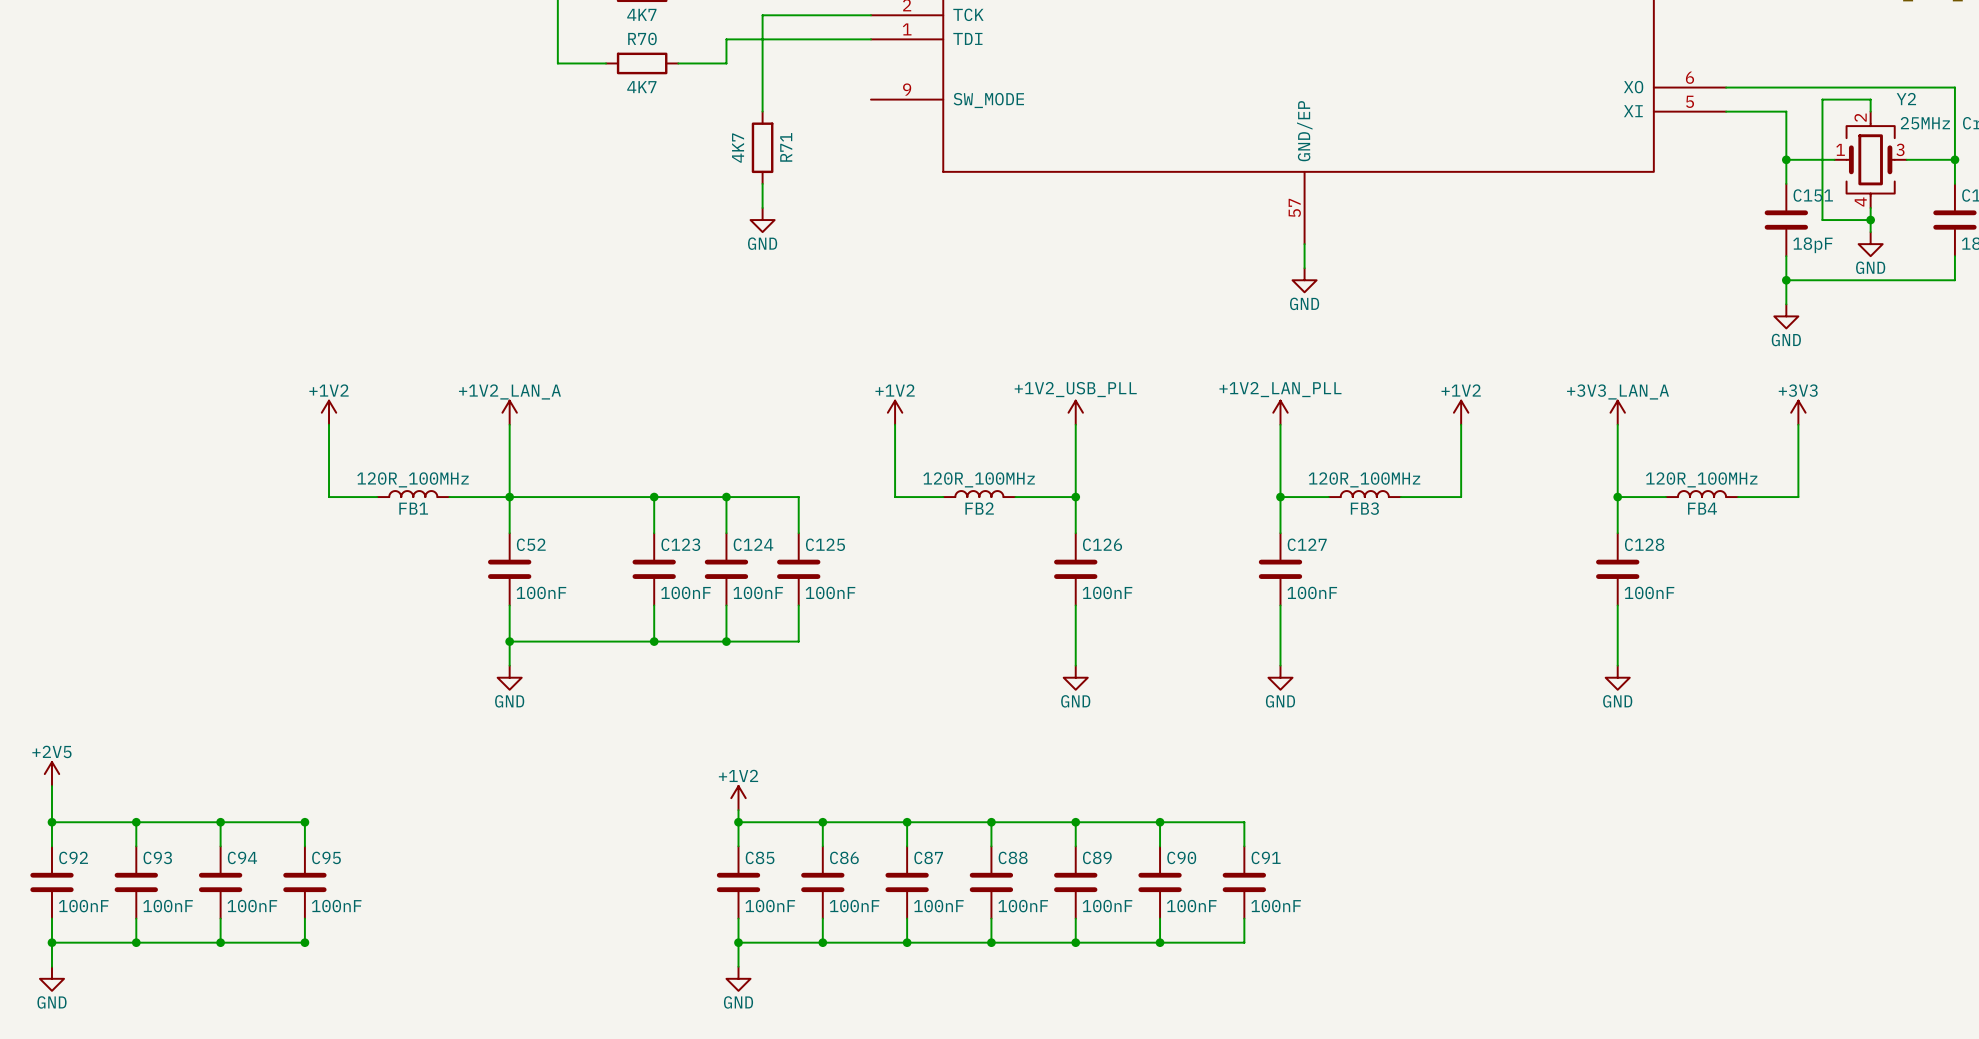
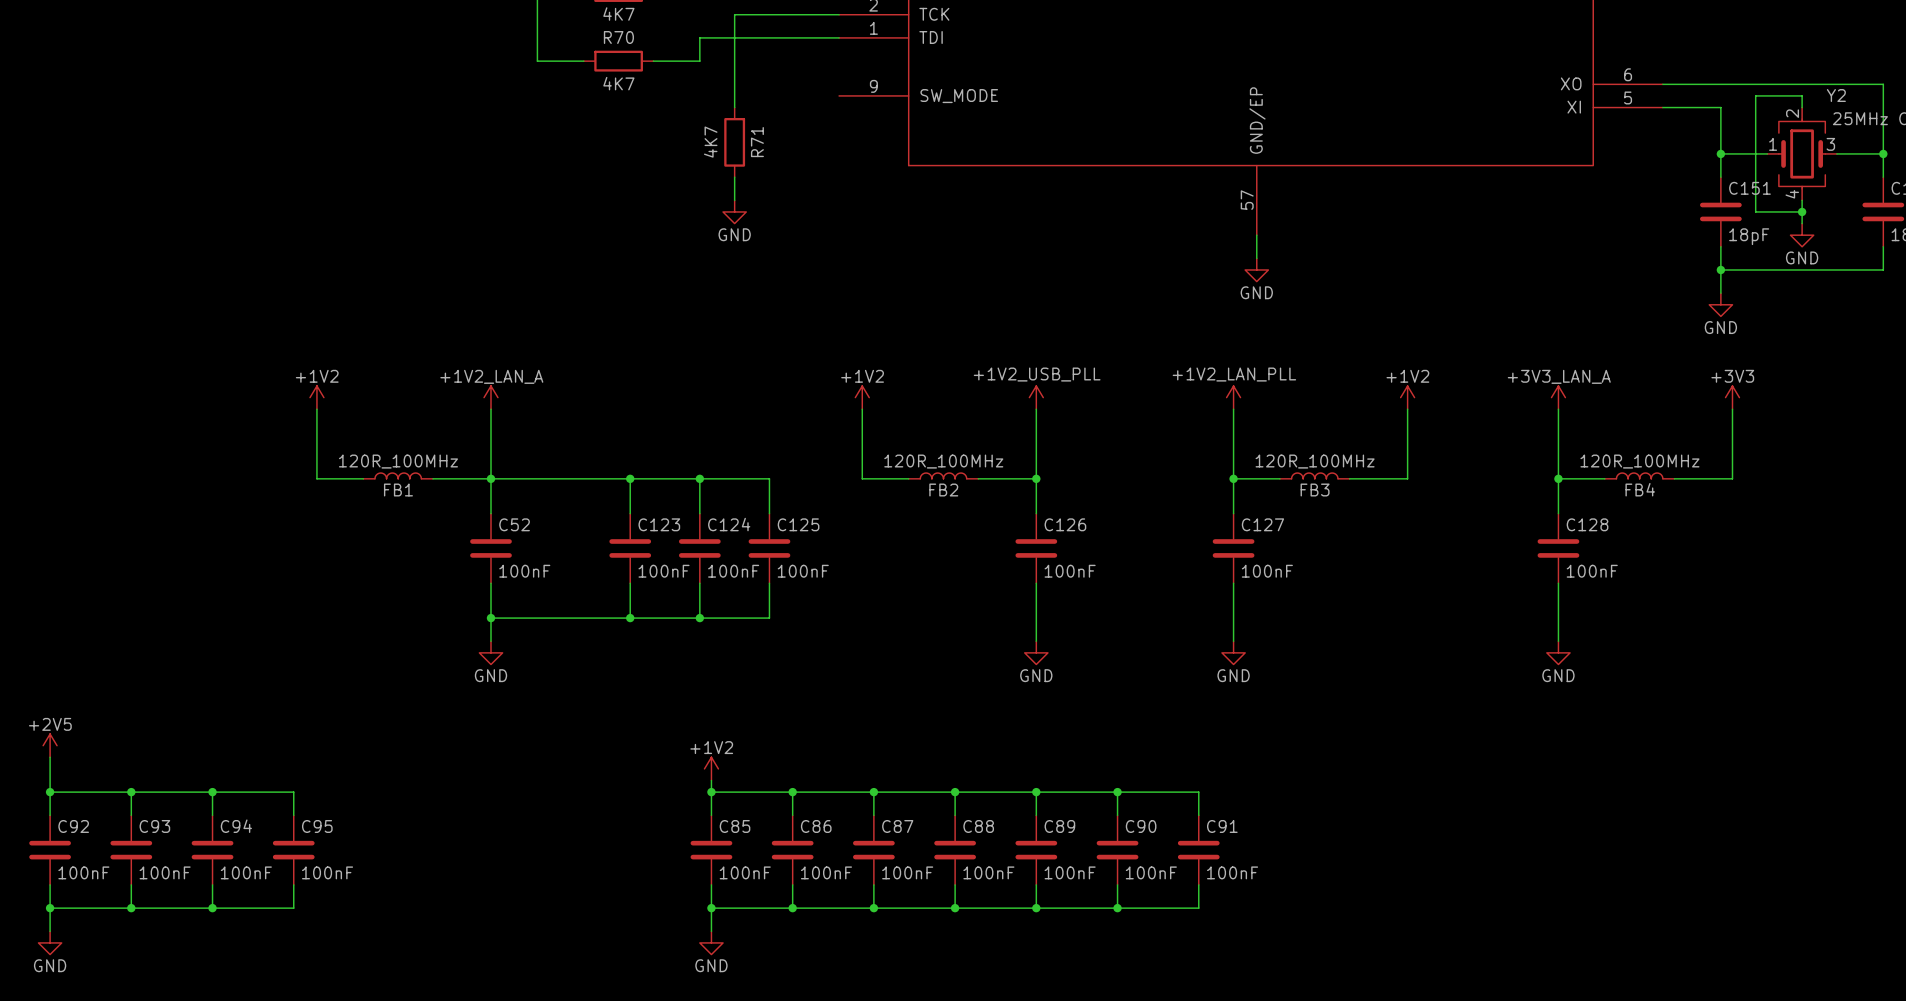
junction: (304, 822) -> none
junction: (304, 942) -> none

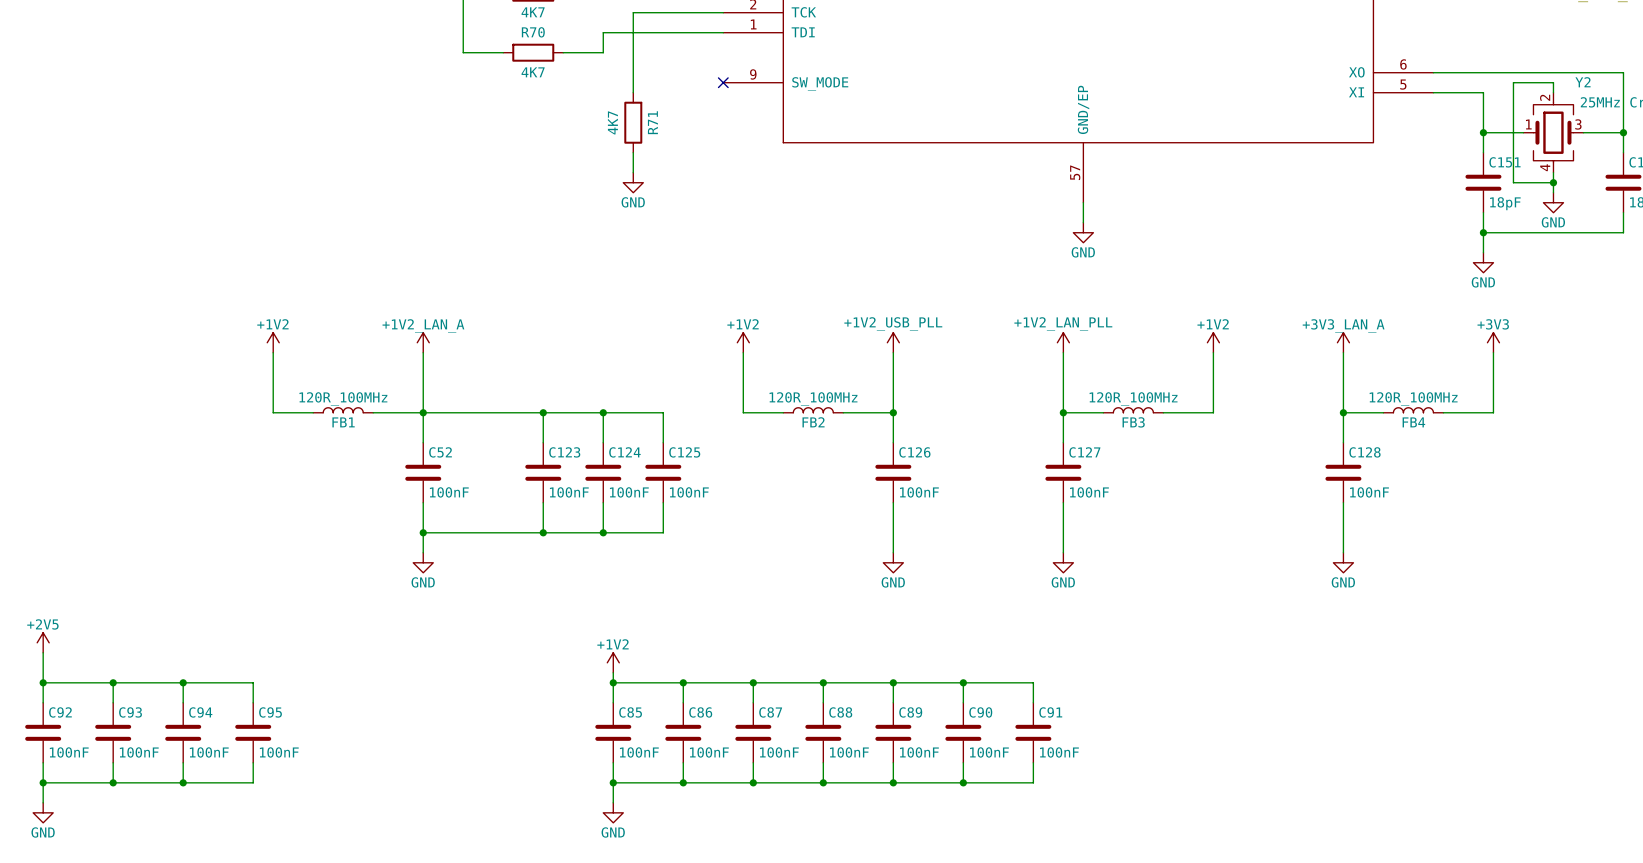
no-connect mark: none -> (723, 82)

